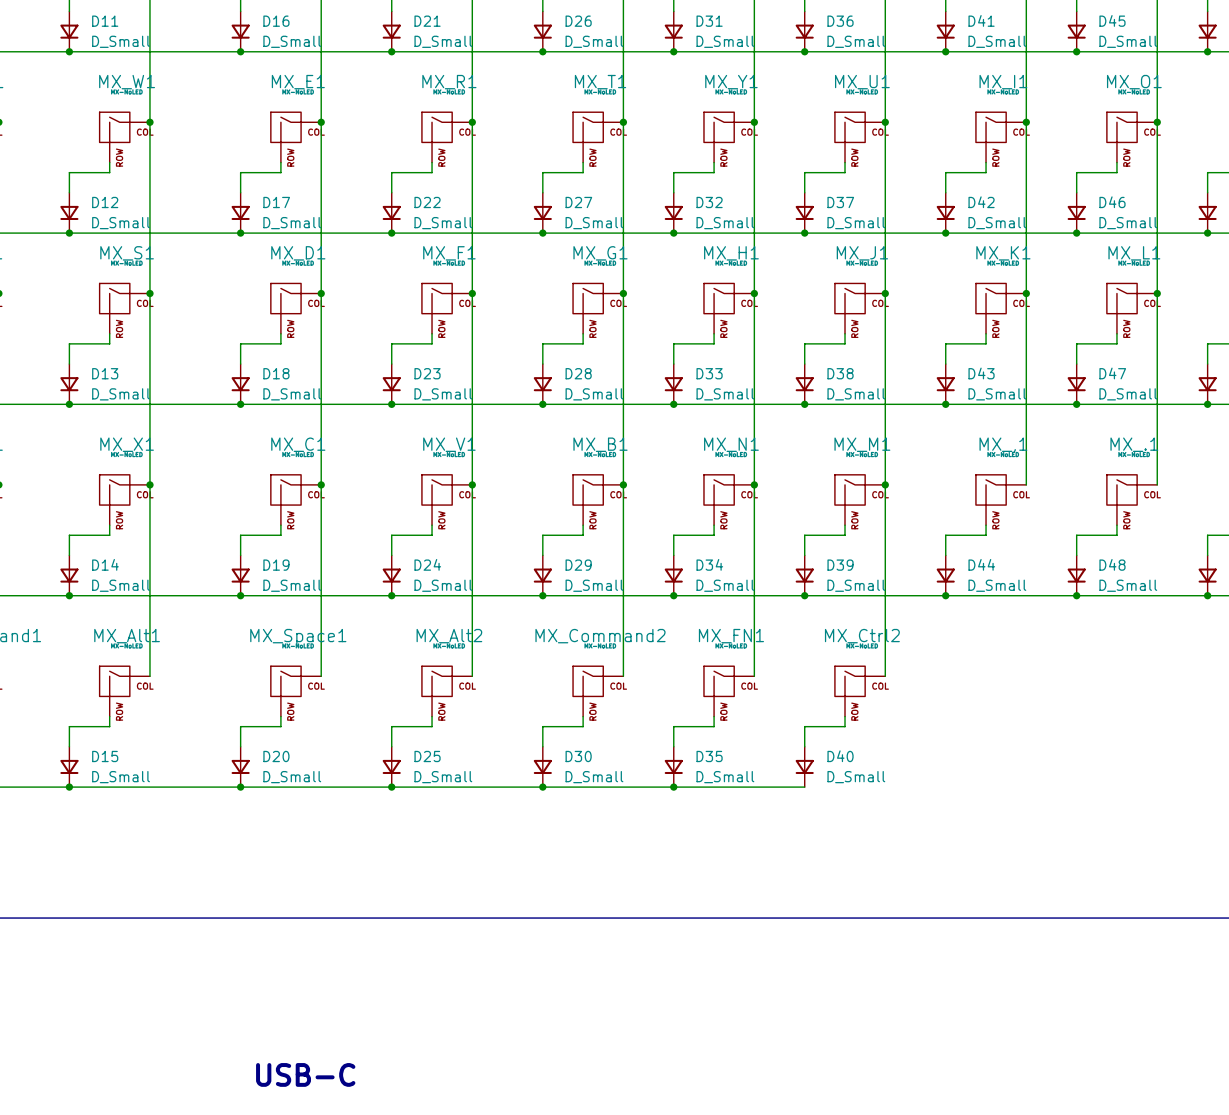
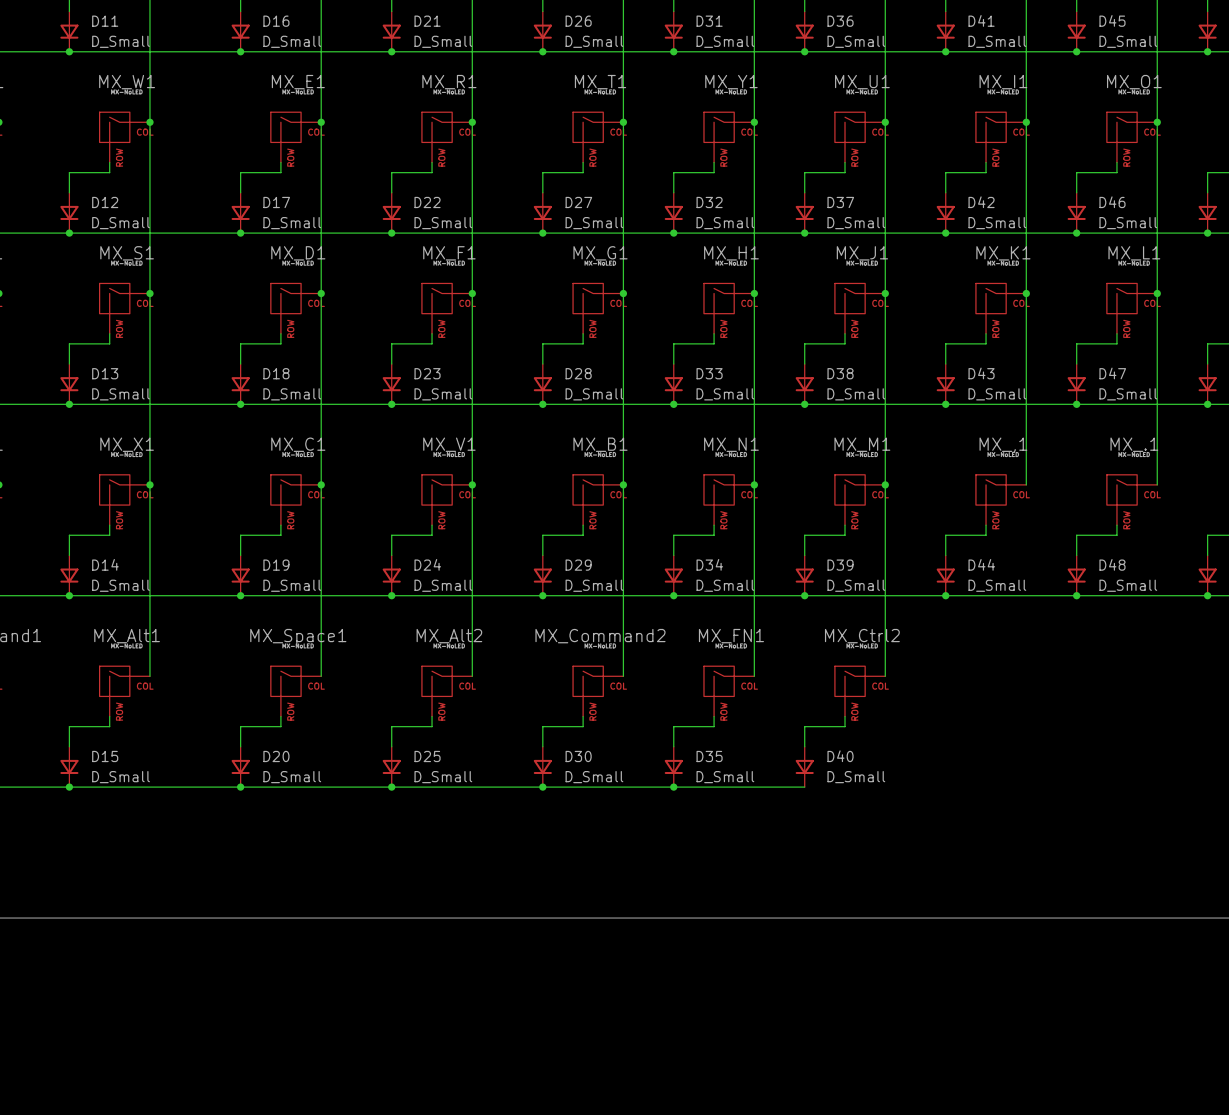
text: USB-C (305, 1074) -> none

